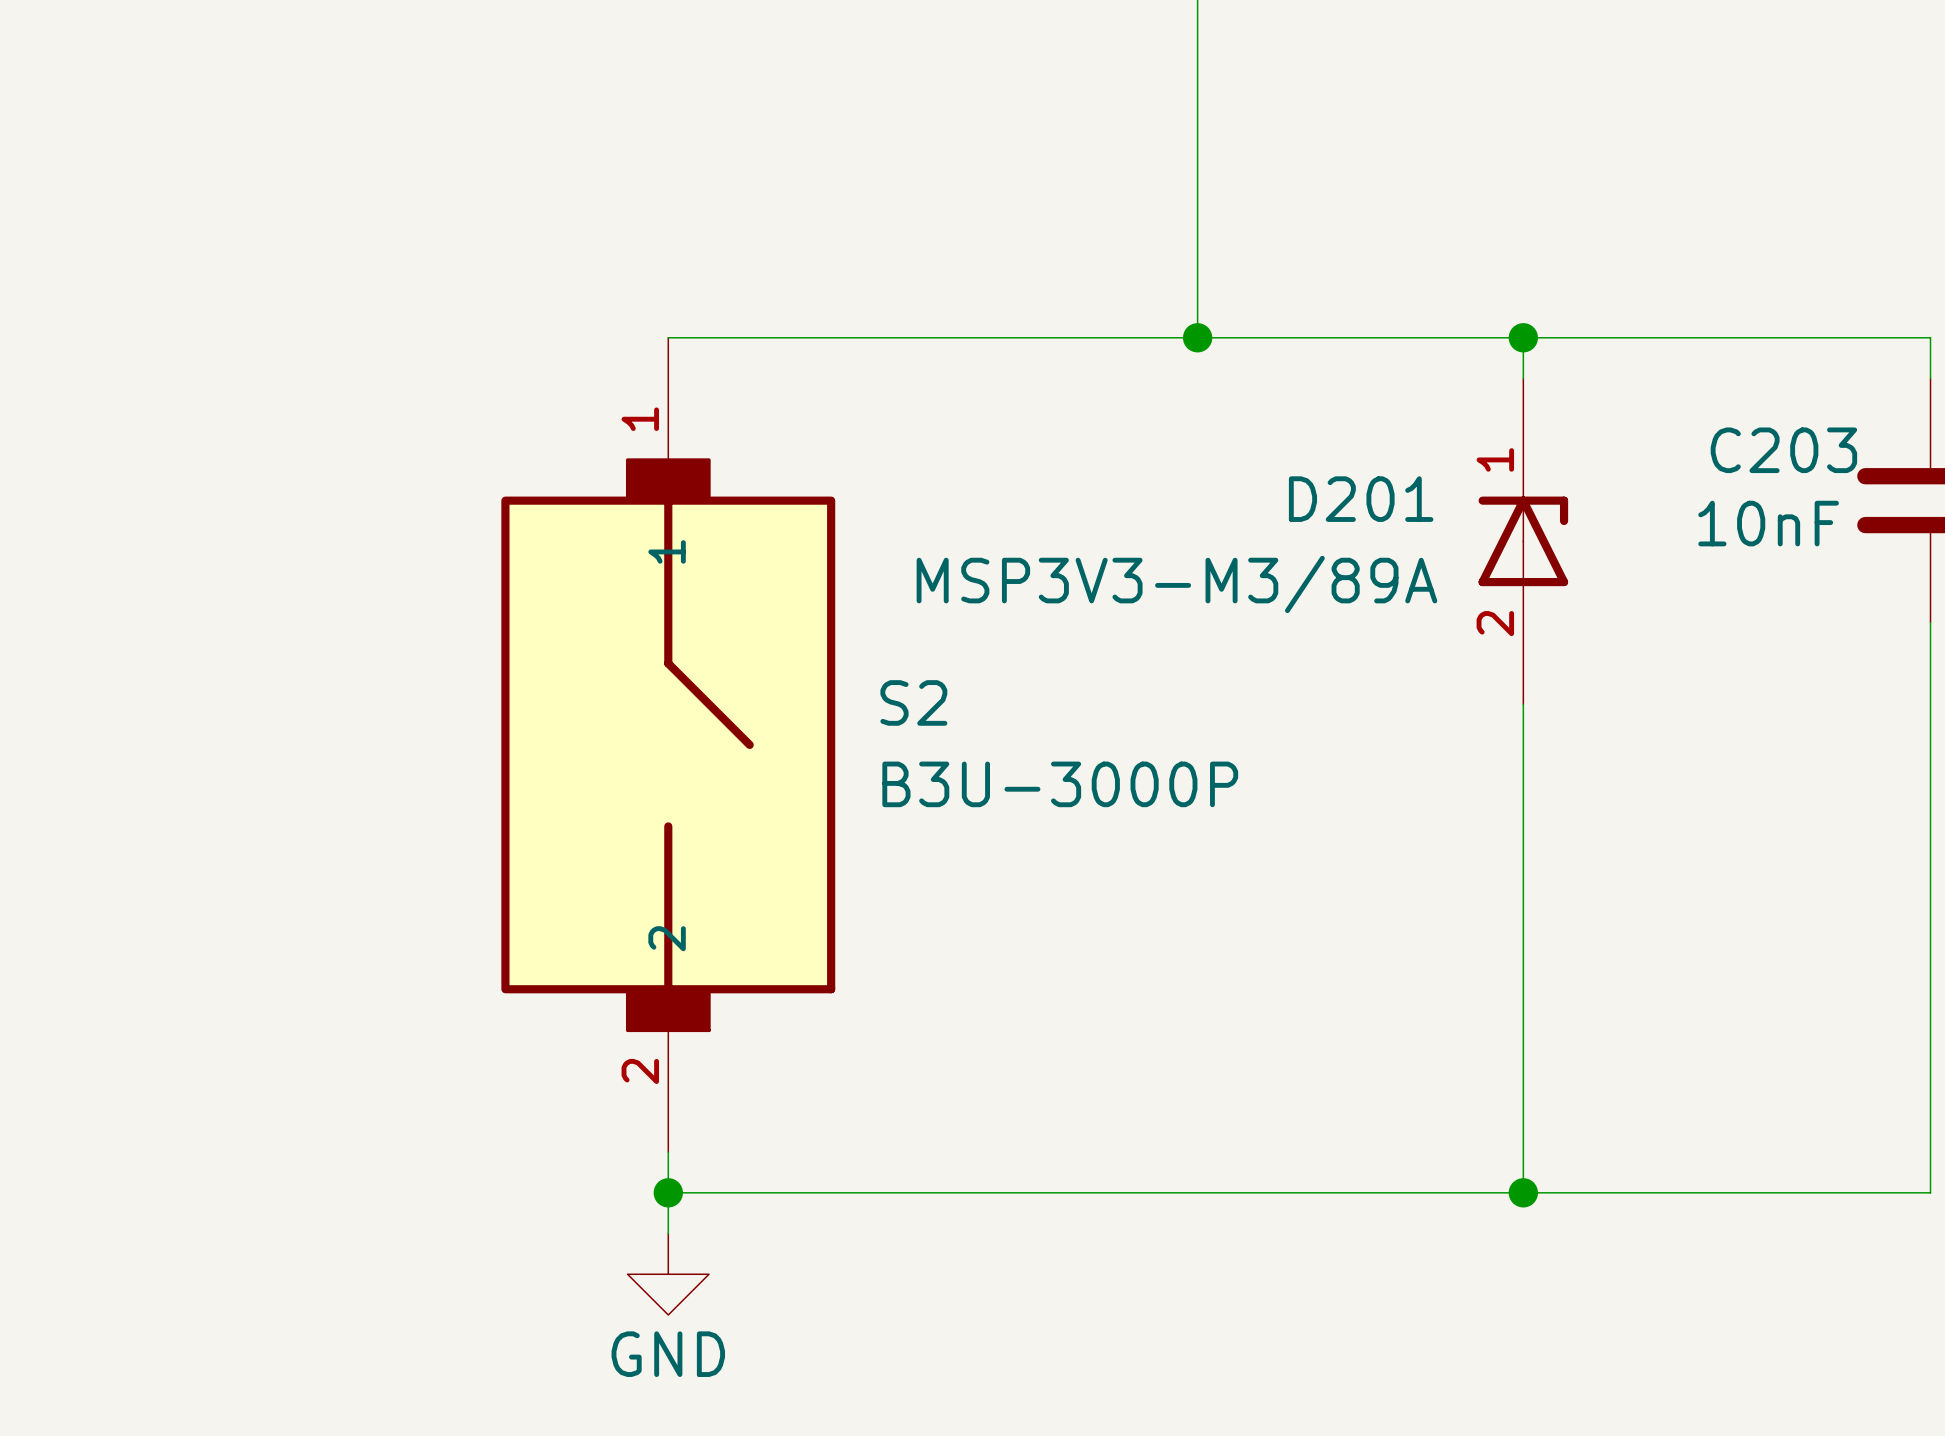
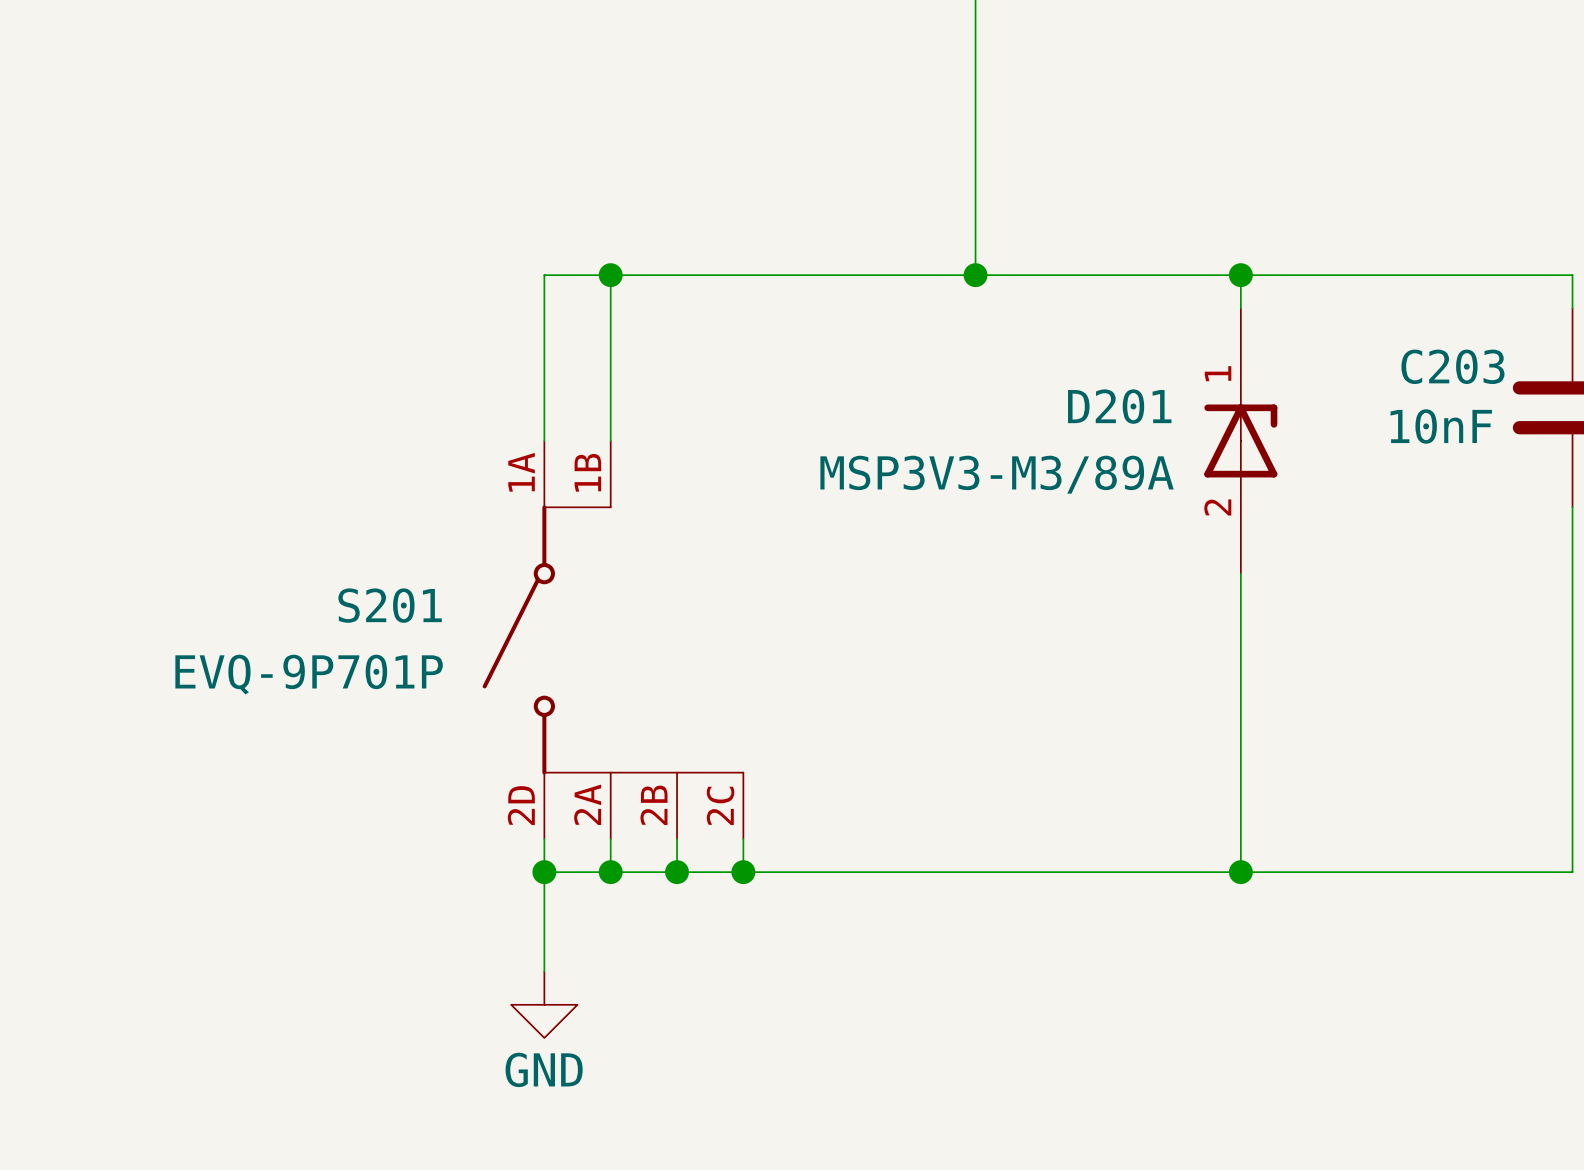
wire: none -> (610, 275) (610, 440)
junction: none -> (610, 275)
S2: B3U-3000P (668, 744) -> none
S201: none -> EVQ-9P701P (613, 639)
wire: none -> (610, 838) (610, 872)
wire: none -> (677, 838) (677, 872)
wire: none -> (743, 838) (743, 872)
junction: none -> (544, 872)
junction: none -> (610, 872)
junction: none -> (677, 872)
junction: none -> (743, 872)
wire: (1523, 1070) (1523, 1192) -> none
wire: (1930, 1070) (1930, 1192) (668, 1192) (668, 1233) -> (1572, 872) (544, 872)
junction: (668, 1192) -> none
junction position: (1523, 1192) -> (1240, 872)
power symbol position: GND (668, 1274) -> GND (544, 1004)

